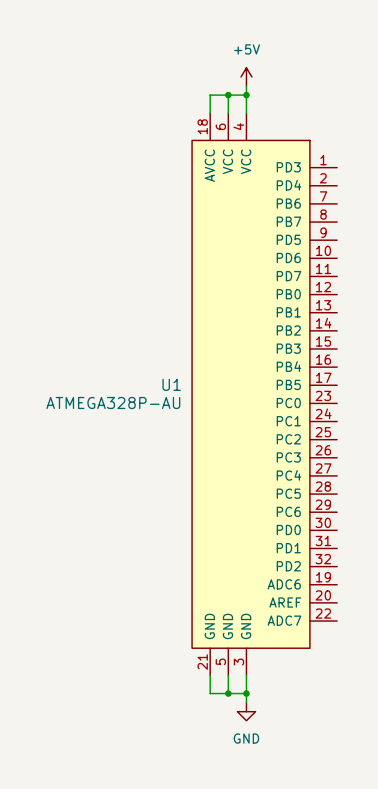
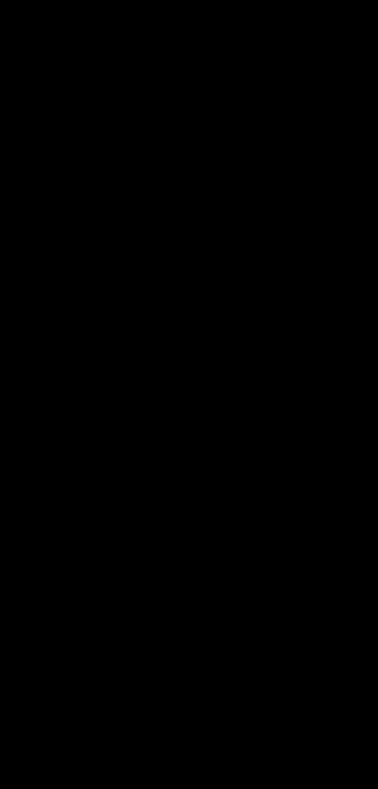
power symbol: +5V (246, 76) -> none
wire: (246, 86) (246, 113) -> none
wire: (228, 95) (228, 113) -> none
junction: (228, 95) -> none
wire: (246, 95) (210, 95) (210, 113) -> none
junction: (246, 95) -> none
U1: ATMEGA328P-AU (264, 394) -> none
wire: (210, 675) (210, 693) (246, 693) -> none
wire: (228, 675) (228, 693) -> none
wire: (246, 675) (246, 702) -> none
junction: (228, 693) -> none
junction: (246, 693) -> none
power symbol: GND (246, 711) -> none

